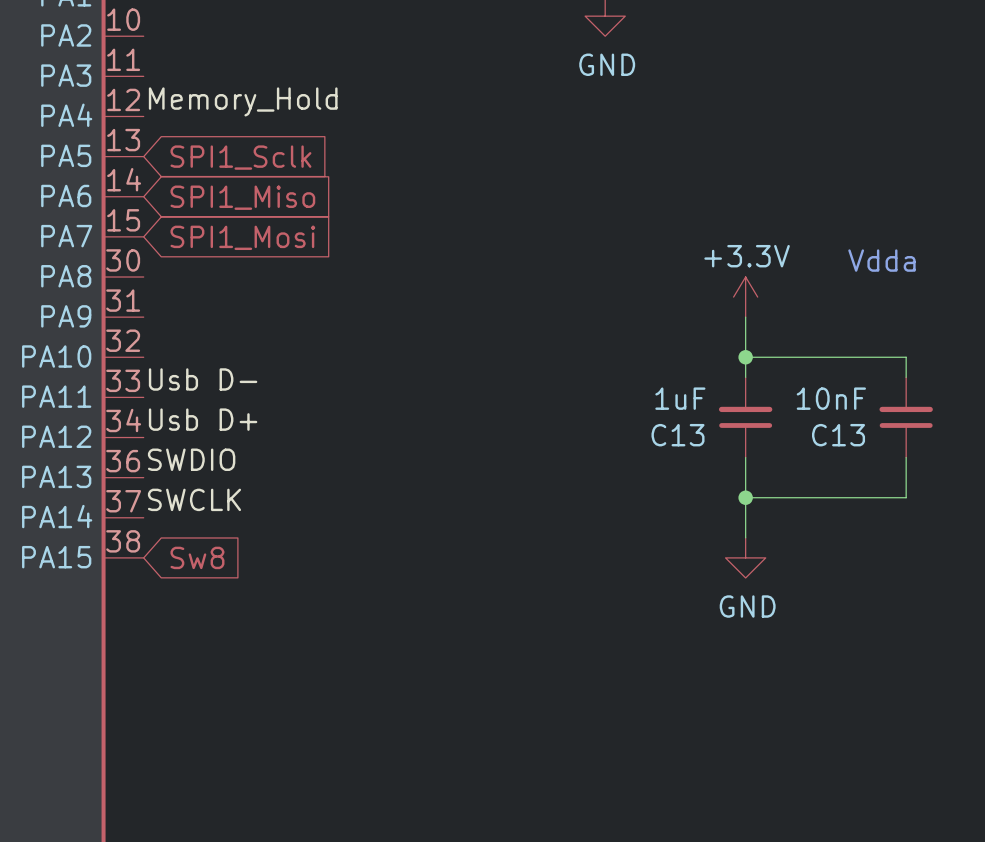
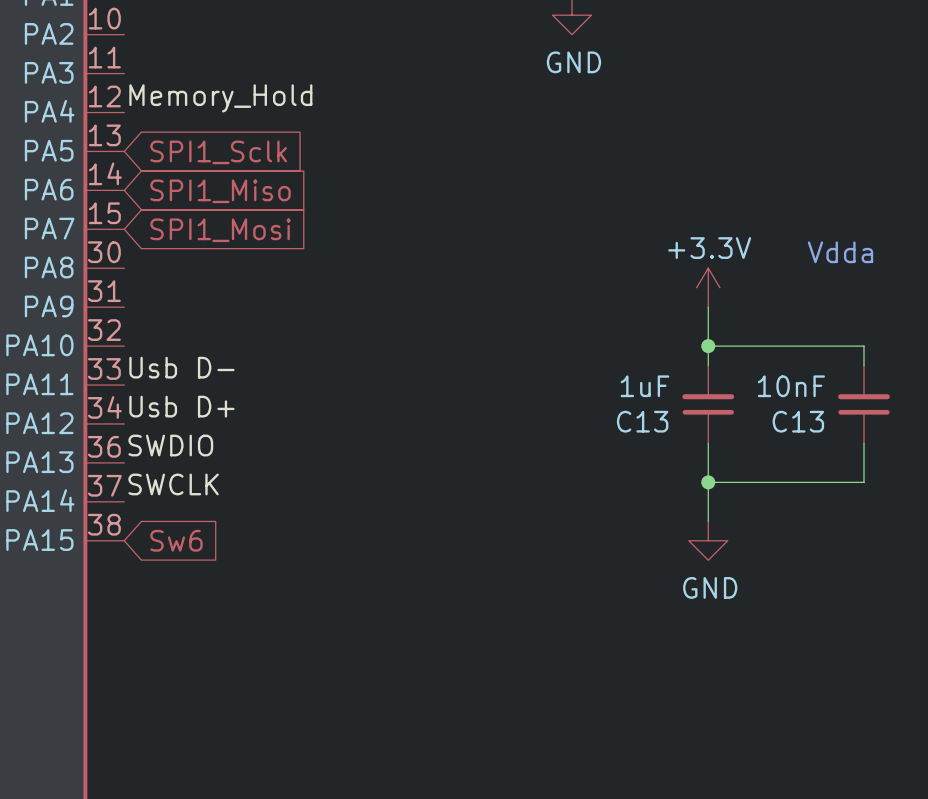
global label: Sw8 (197, 557) -> Sw6 (176, 540)

